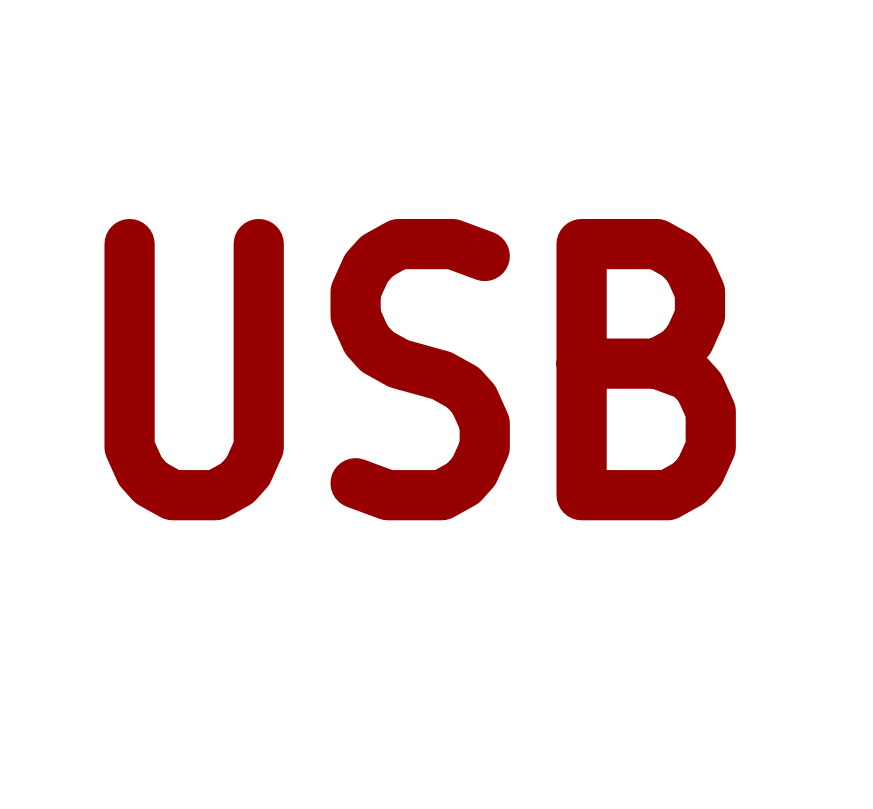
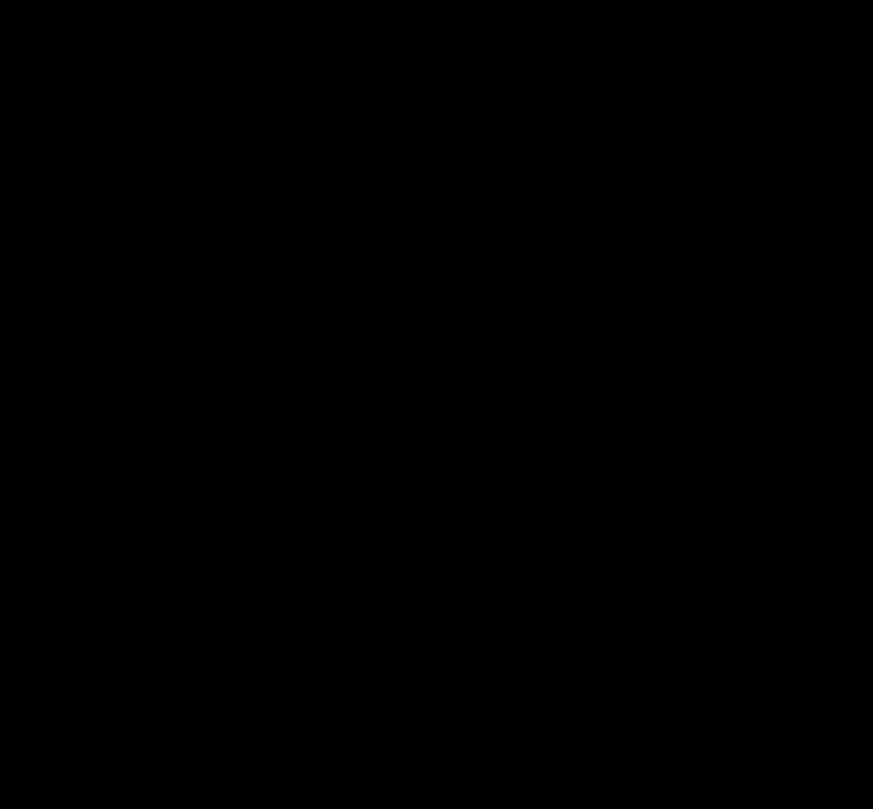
text: USB (420, 369) -> none

